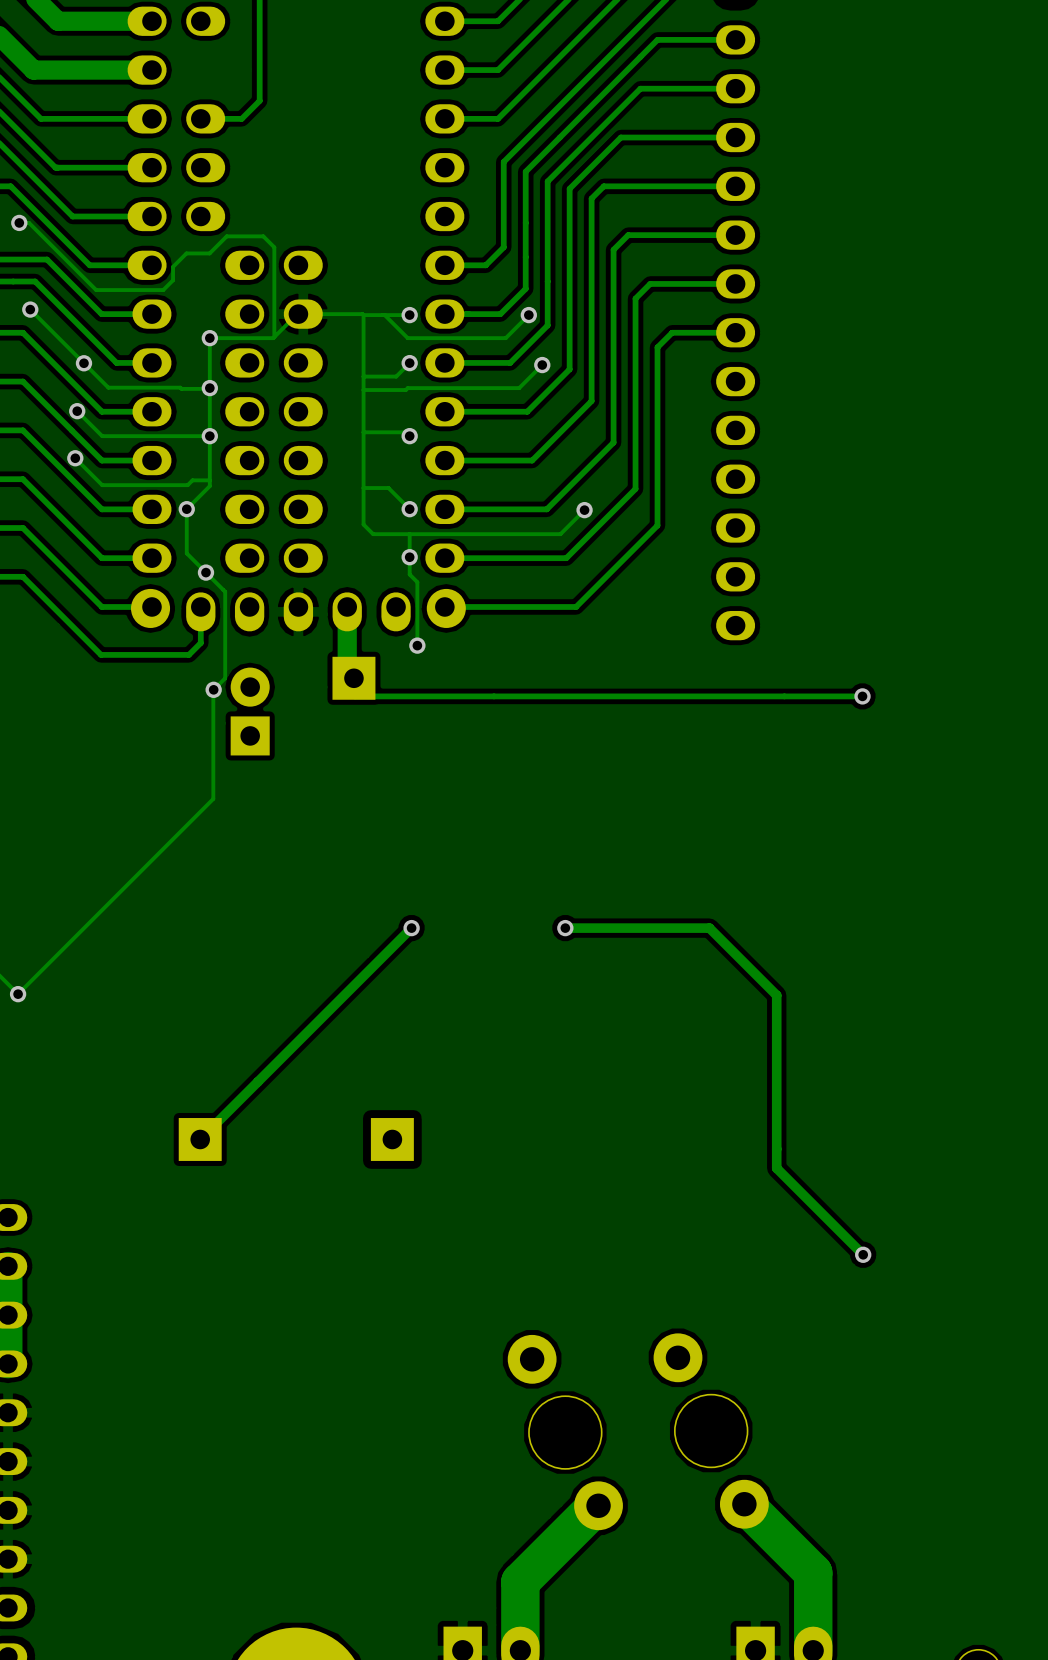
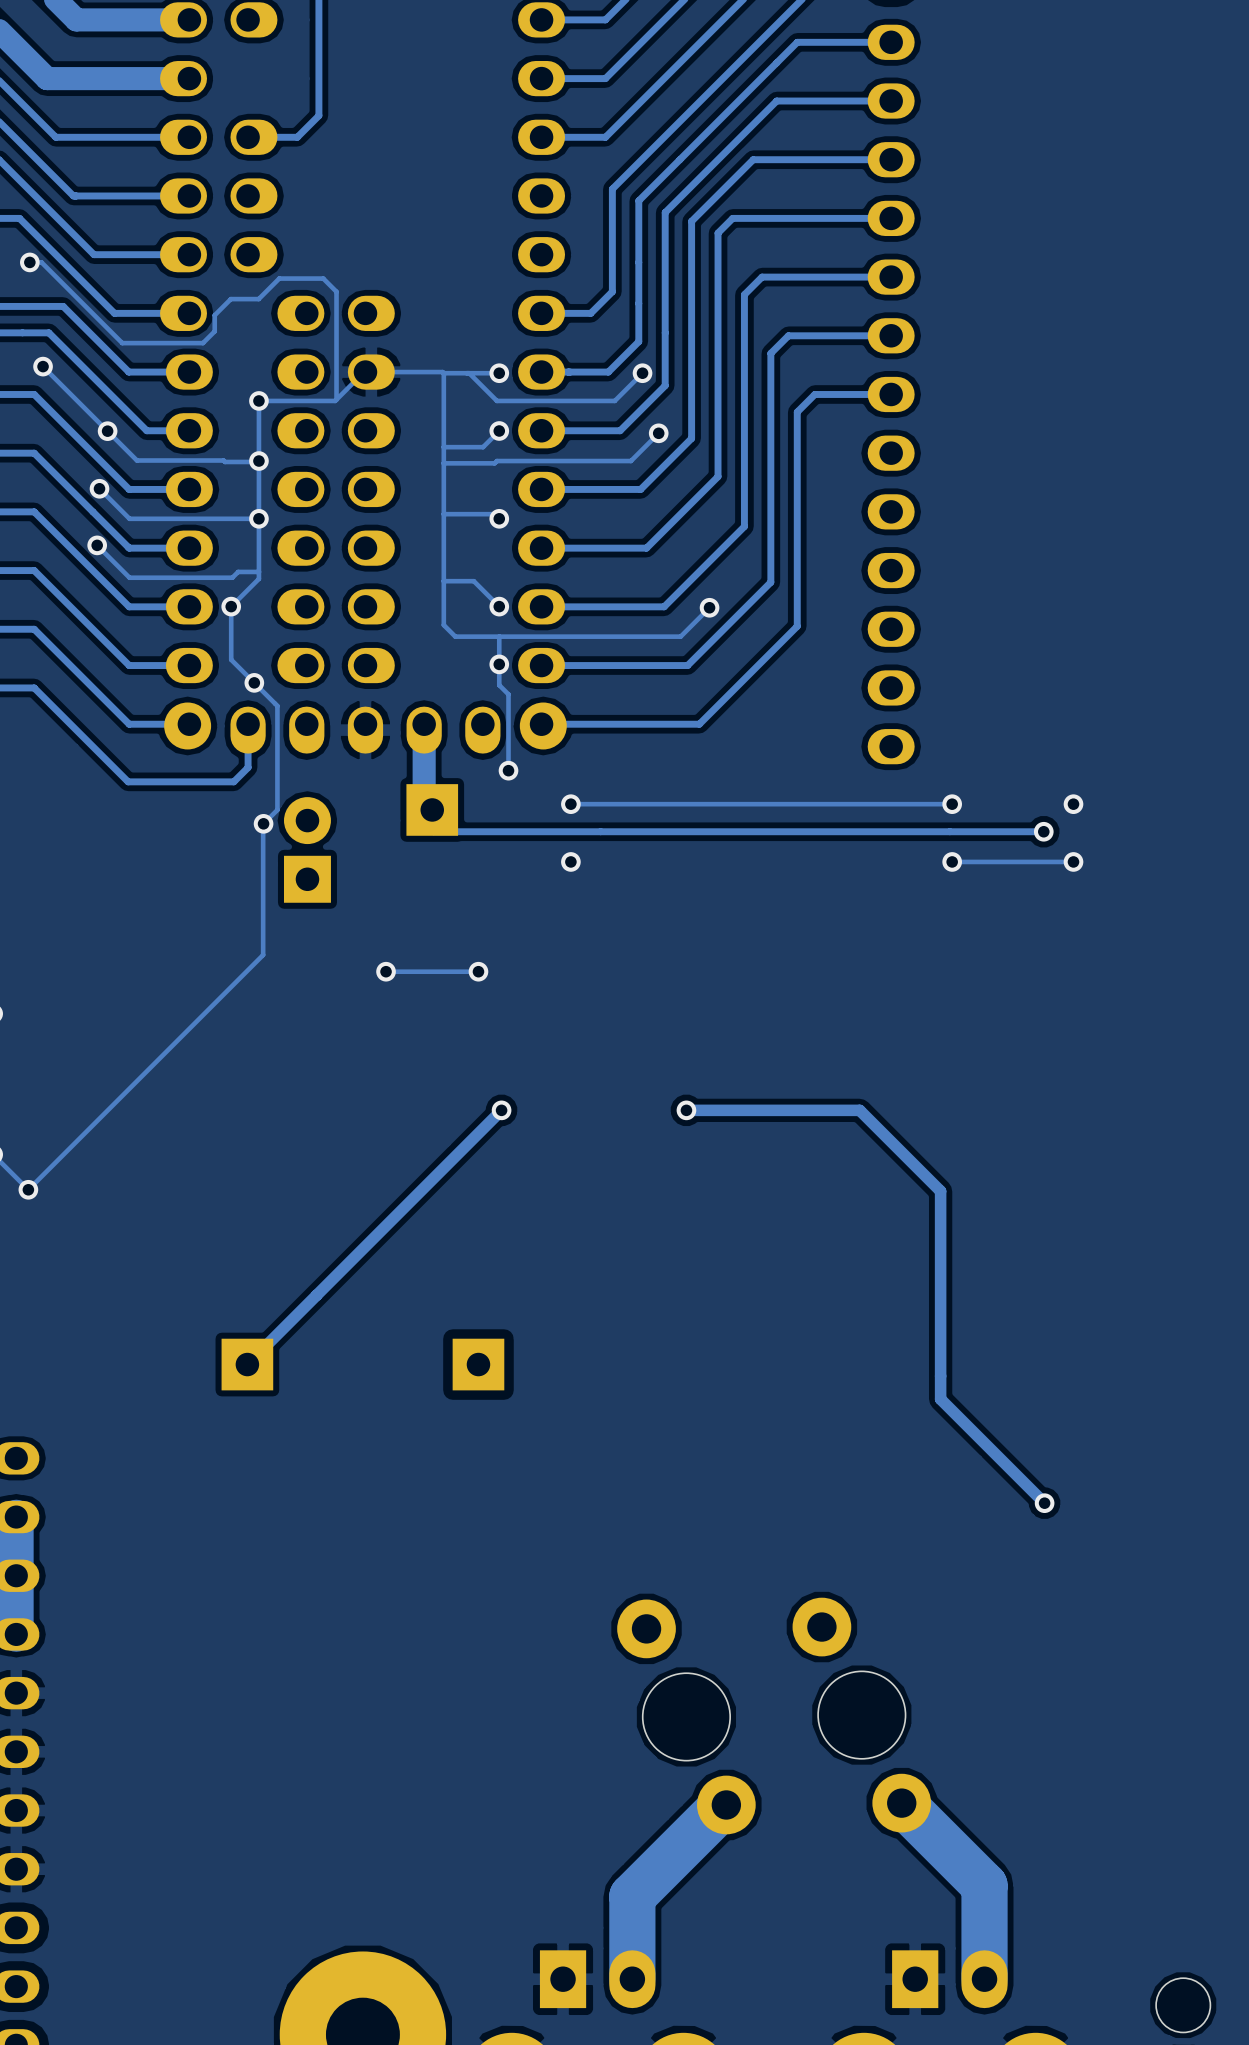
via: none -> (570, 804)
track: none -> (952, 804) (570, 804)
via: none -> (952, 804)
via: none -> (1073, 804)
via: none -> (570, 861)
via: none -> (952, 861)
track: none -> (1073, 861) (952, 861)
via: none -> (1073, 861)
via: none -> (386, 971)
track: none -> (478, 971) (386, 971)
via: none -> (478, 971)

